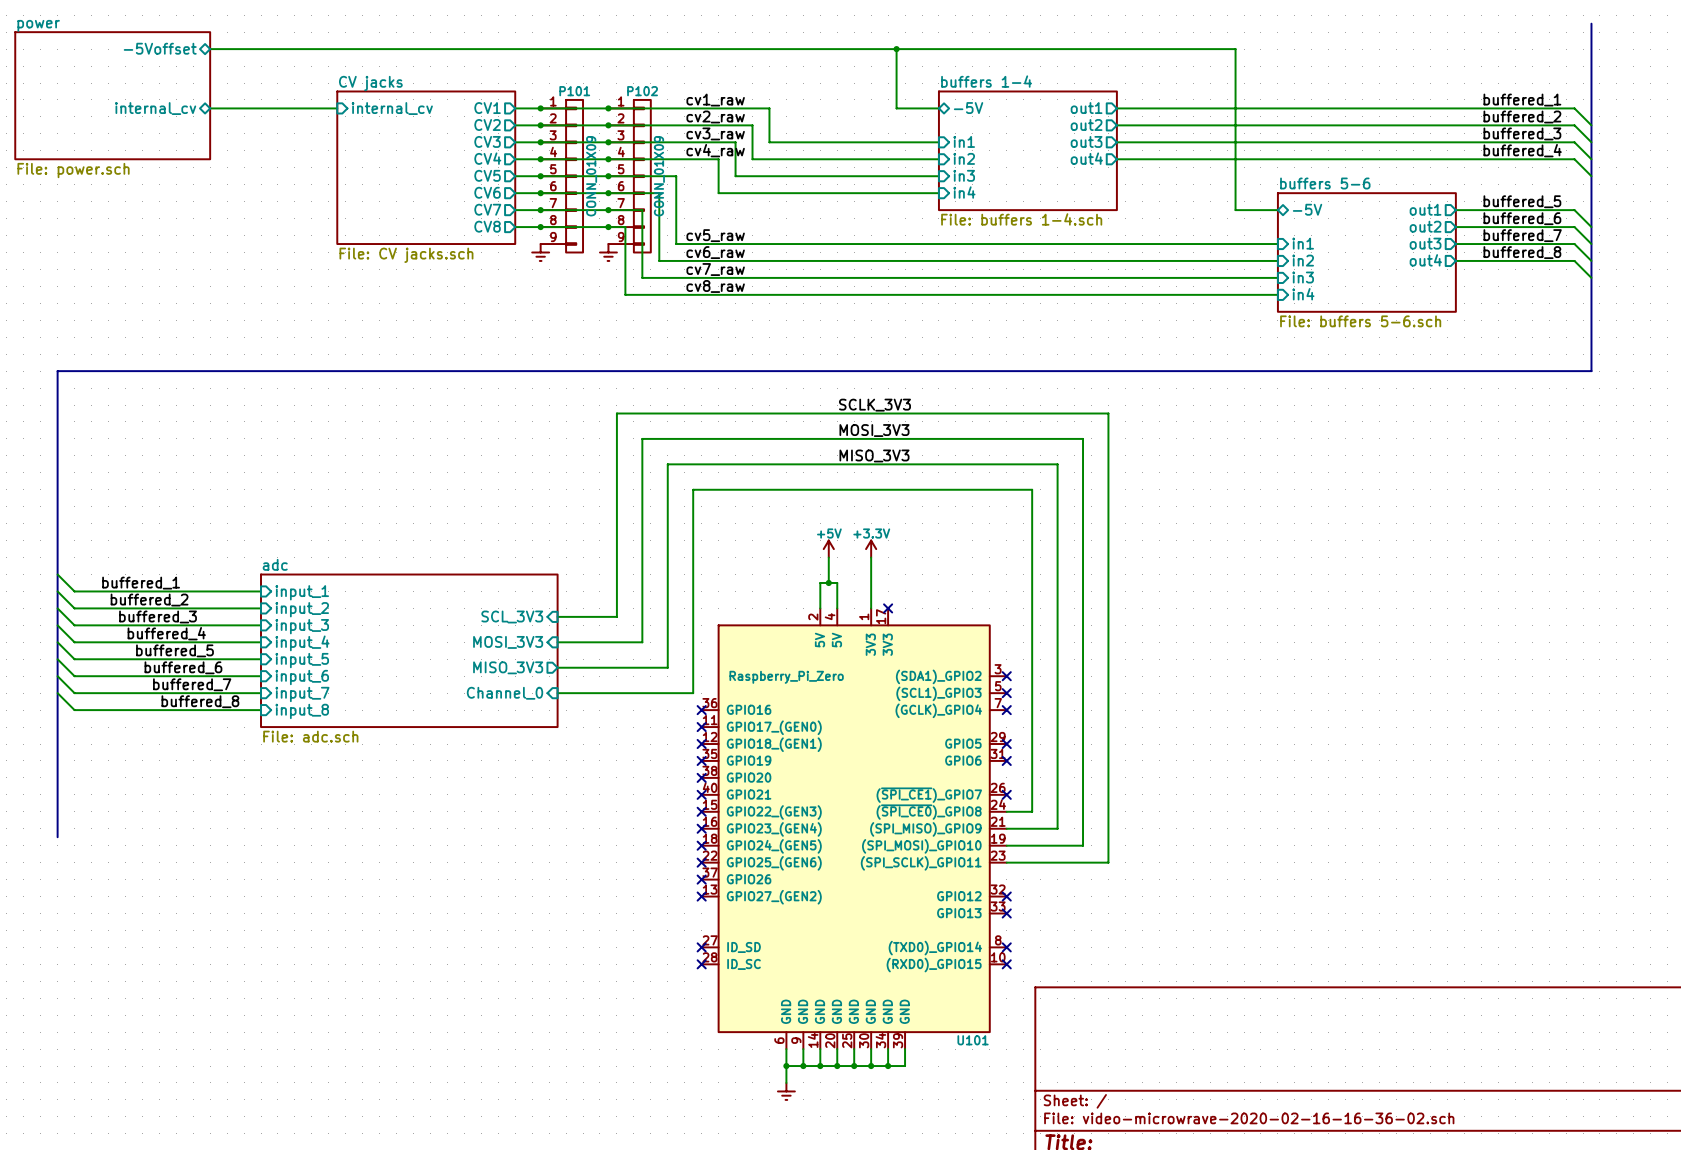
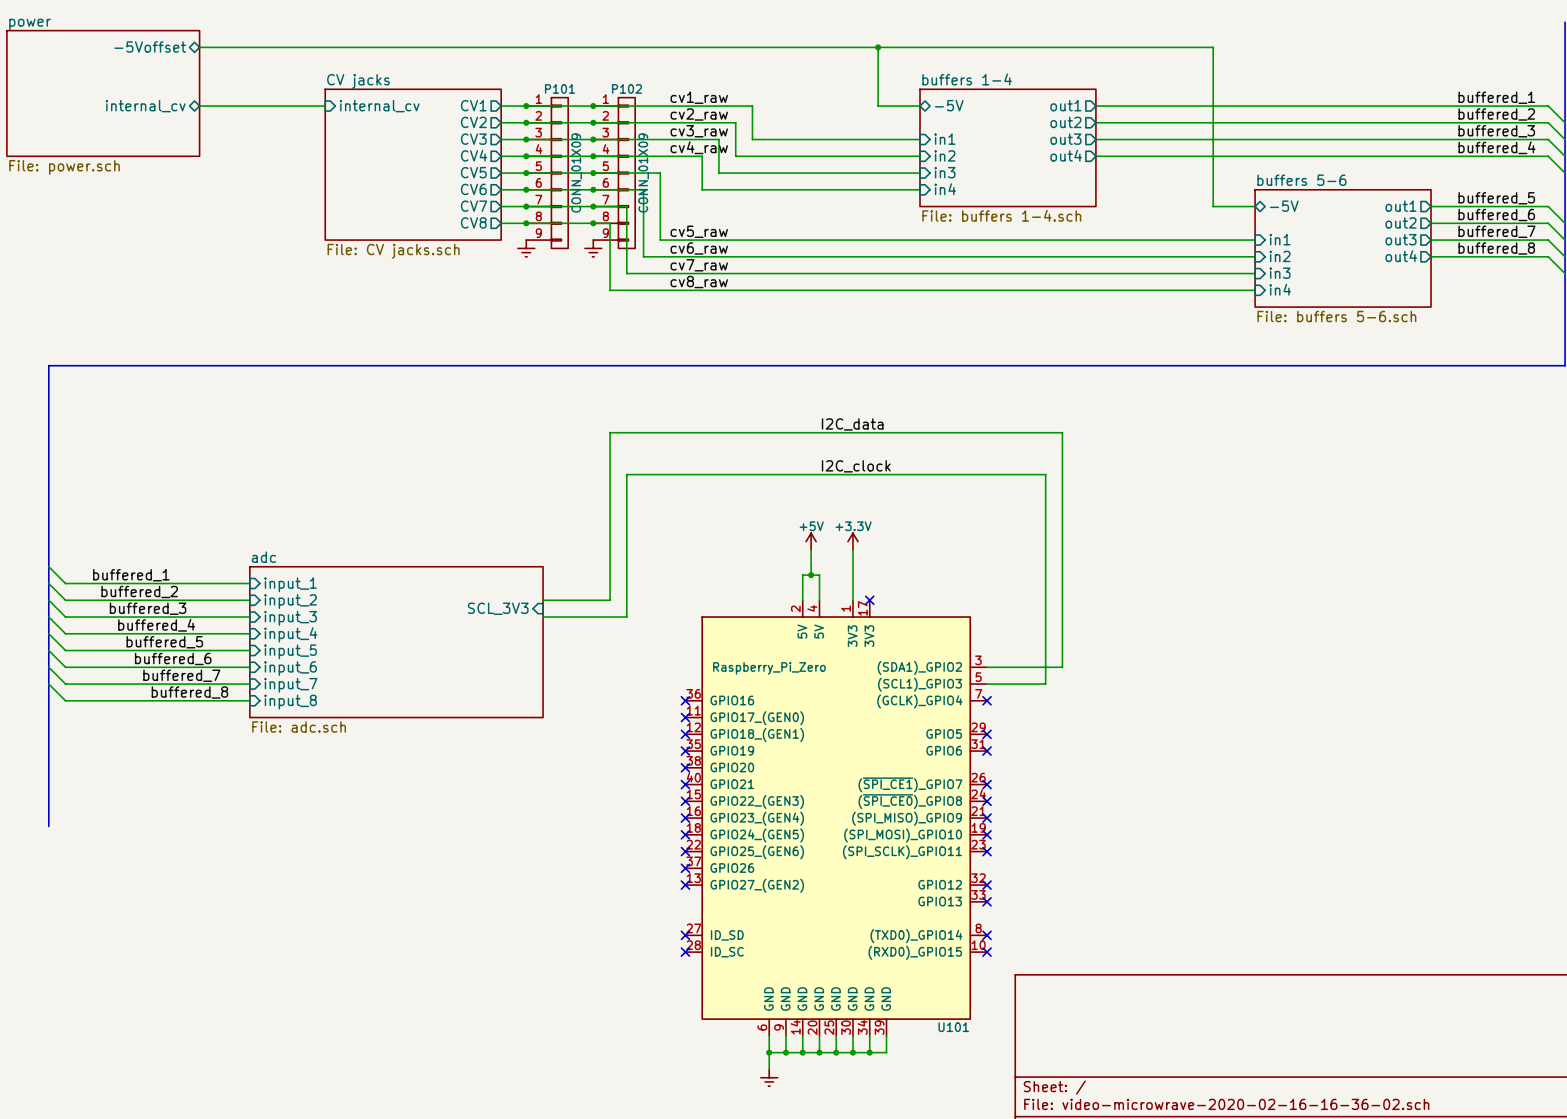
label: SCLK_3V3 (874, 405) -> none
label: MOSI_3V3 (874, 430) -> I2C_data (852, 424)
wire: (642, 438) (642, 481) -> (626, 432) (610, 432) (610, 600) (543, 600)
label: MISO_3V3 (874, 455) -> none
label: none -> I2C_clock (856, 466)
wire: none -> (626, 474) (1045, 474) (1045, 684) (987, 684)
wire: (557, 616) (616, 616) (616, 413) (1108, 413) (1108, 862) (1006, 862) -> none
wire: (642, 625) (642, 642) (557, 642) -> (626, 617) (543, 617)
sheet pin: MOSI_3V3 (508, 642) -> none
sheet pin: MISO_3V3 (508, 667) -> none
wire: (557, 667) (667, 667) (667, 464) (1057, 464) (1057, 828) (1006, 828) -> none
no-connect mark: (1006, 676) -> none
wire: (1083, 676) (1083, 845) (1006, 845) -> (1062, 667) (987, 667)
sheet pin: Channel_0 (505, 693) -> none
wire: (557, 693) (693, 693) (693, 489) (1032, 489) (1032, 811) (1006, 811) -> none
no-connect mark: (1006, 693) -> none
no-connect mark: none -> (987, 801)
no-connect mark: none -> (987, 818)
no-connect mark: none -> (987, 834)
no-connect mark: none -> (987, 851)

